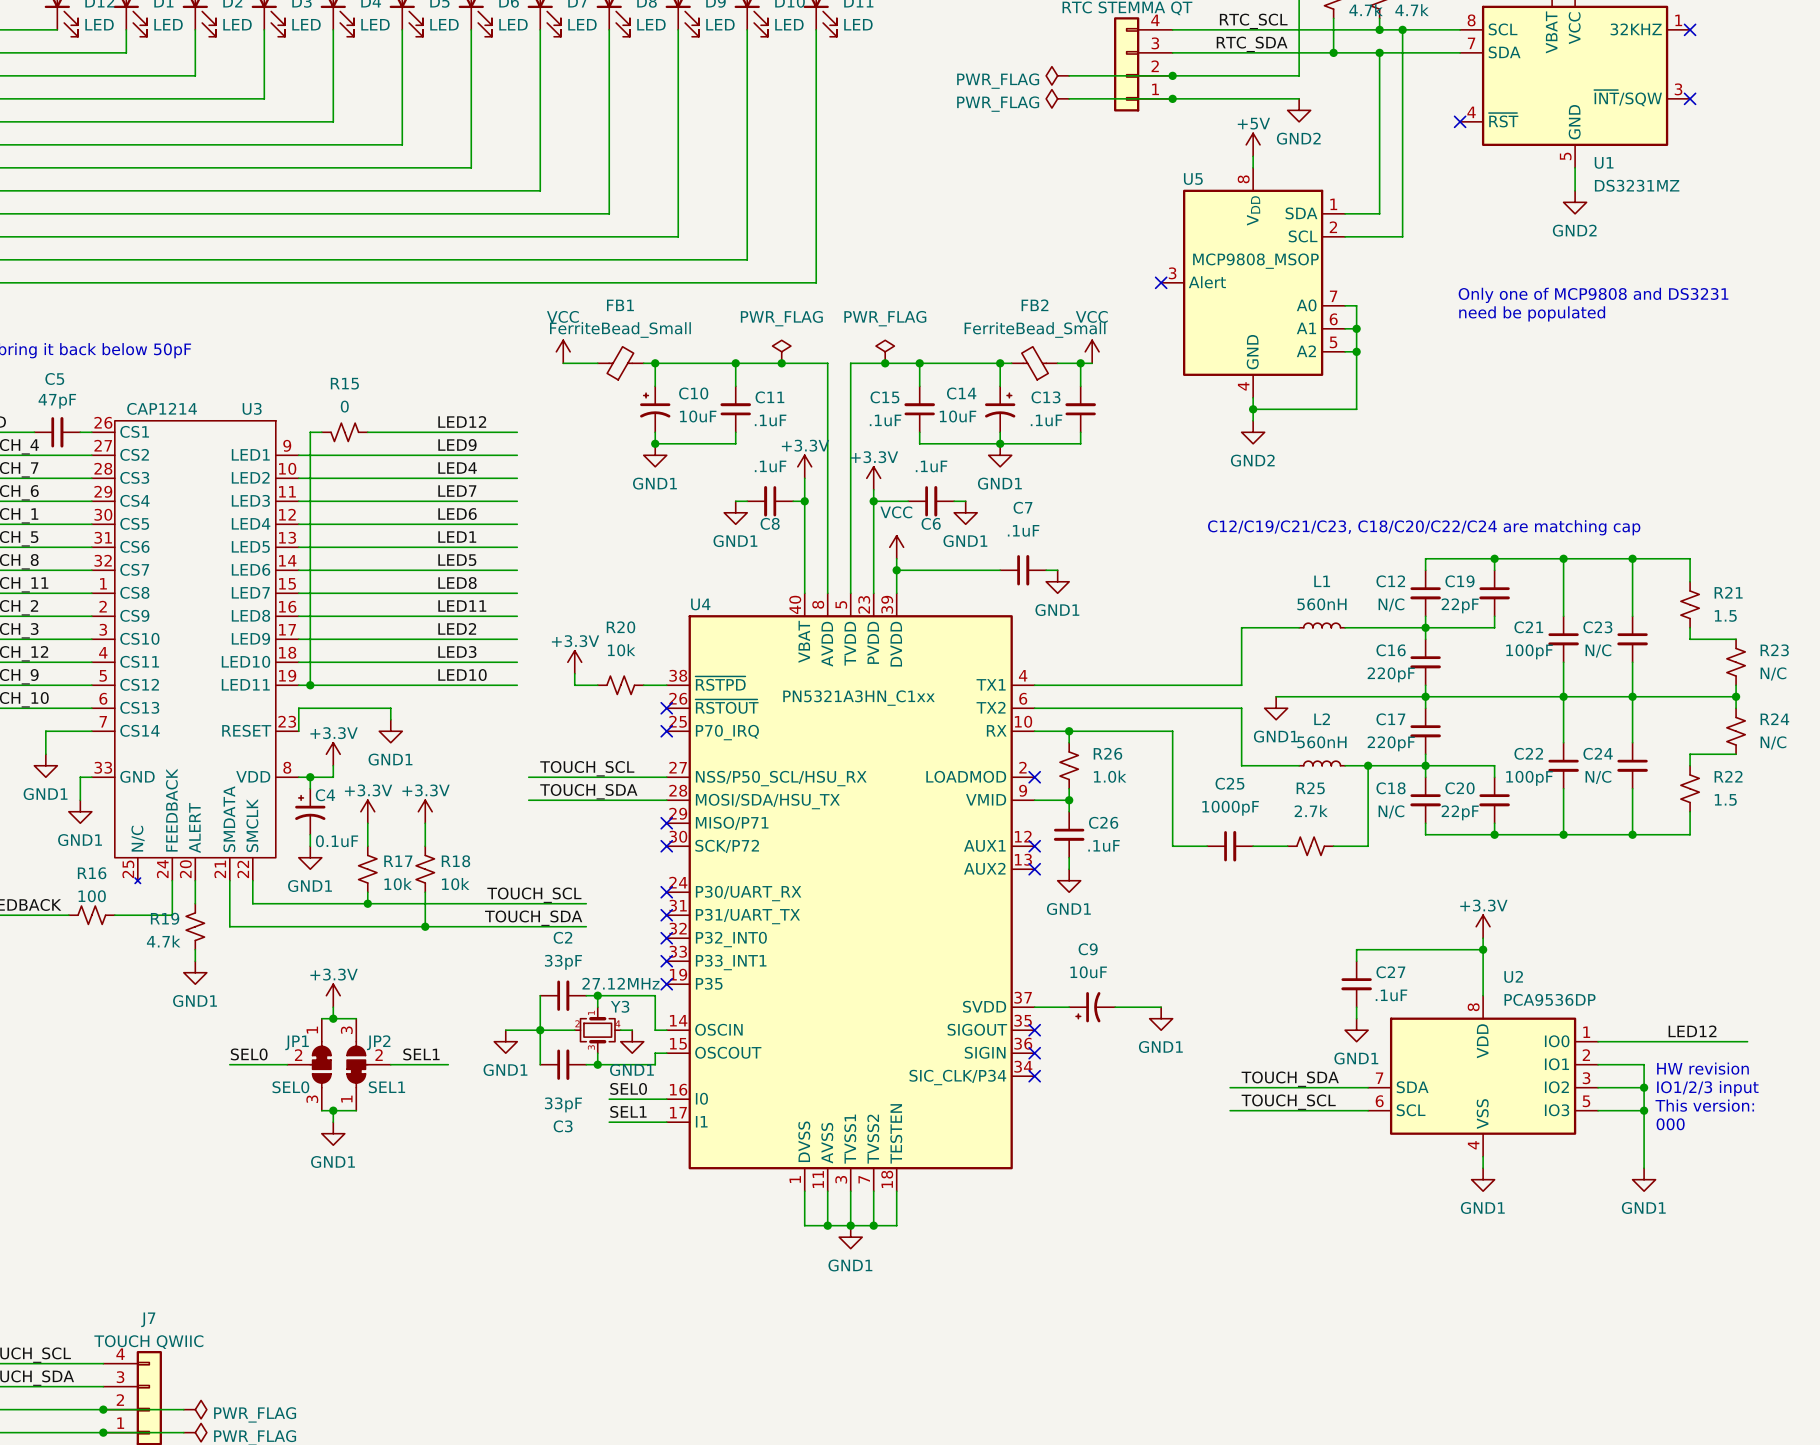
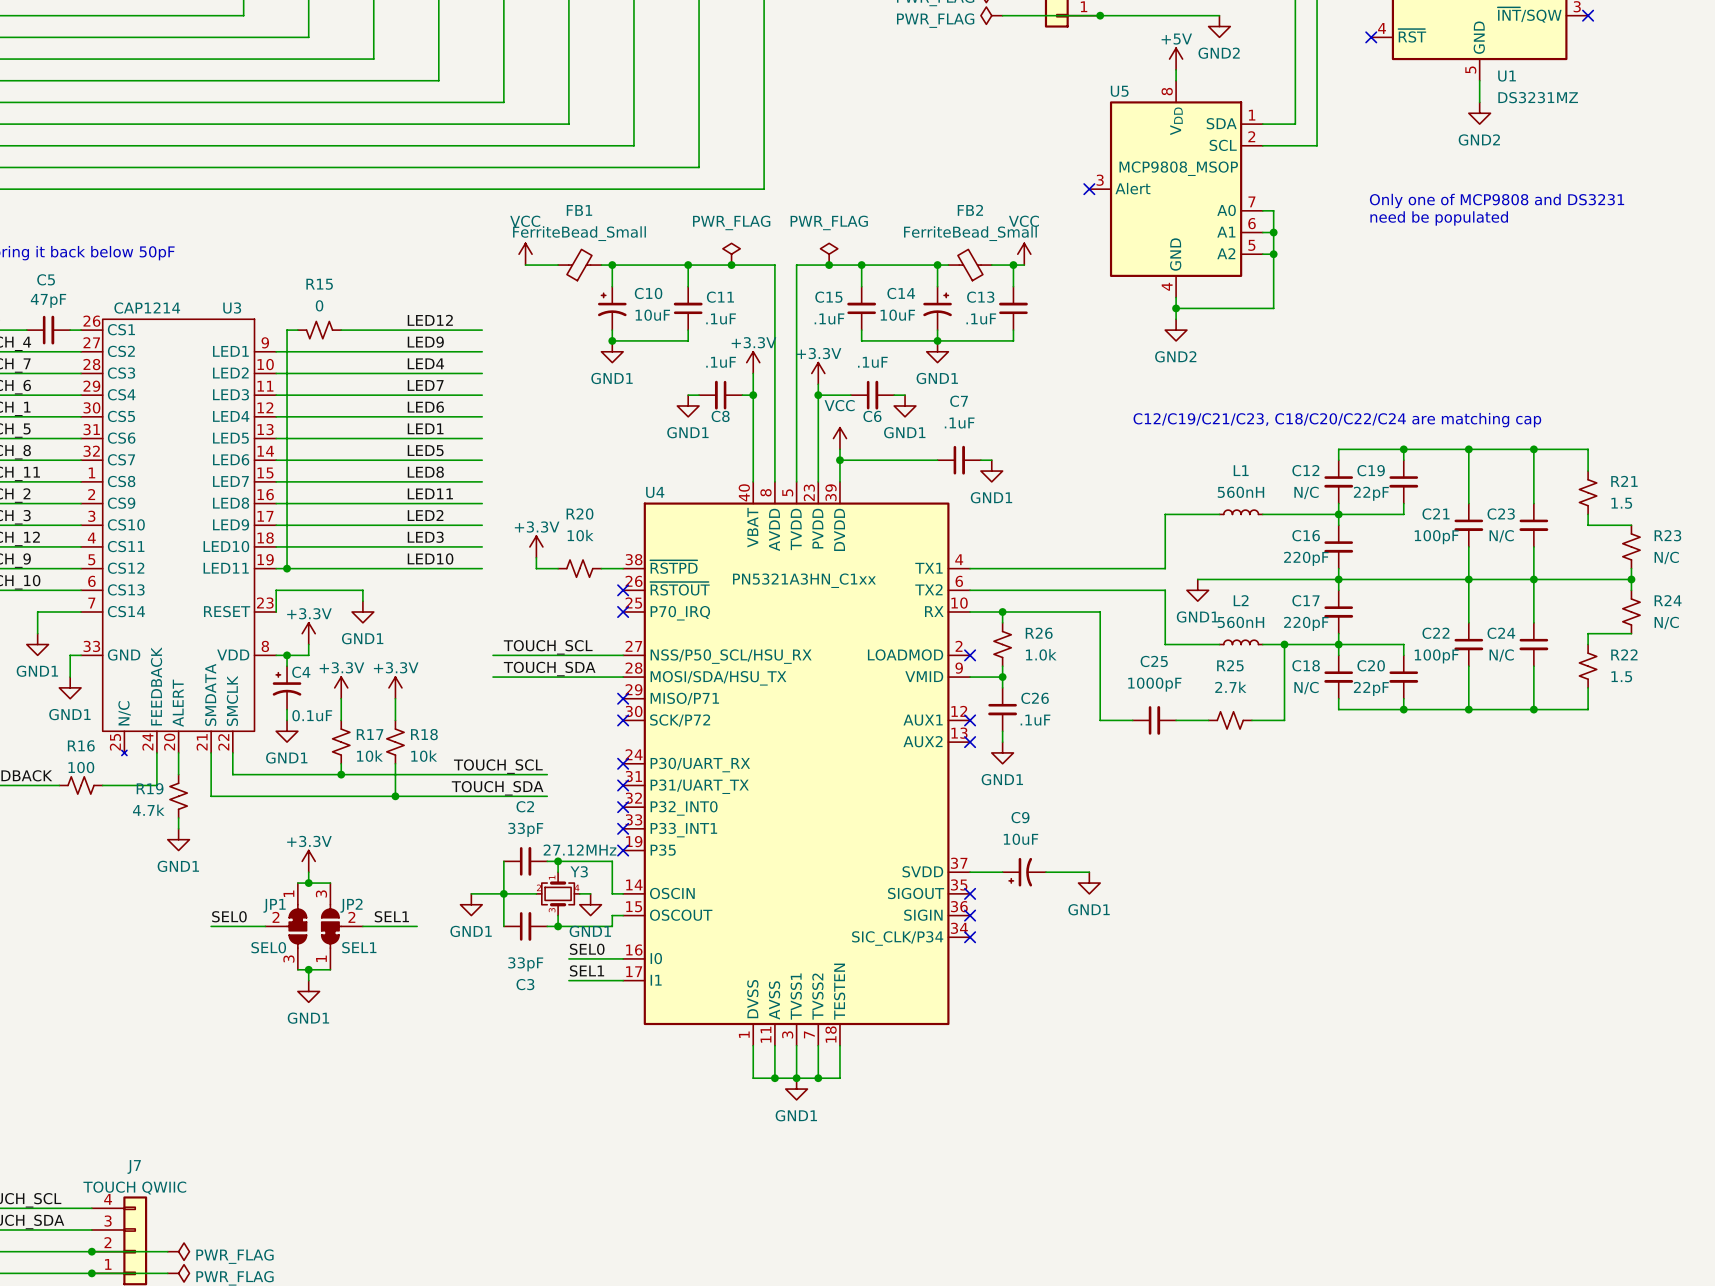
power symbol: +3.3V (1483, 926) -> none
wire: (1483, 938) (1483, 995) -> none
wire: (1483, 949) (1356, 949) (1356, 961) -> none
junction: (1483, 949) -> none
C27: .1uF (1356, 984) -> none
wire: (1356, 1007) (1356, 1018) -> none
power symbol: GND1 (1356, 1030) -> none
label: LED12 (1692, 1031) -> none
wire: (1598, 1041) (1747, 1041) -> none
wire: (1598, 1064) (1644, 1064) (1644, 1168) -> none
text: HW revision (1702, 1068) -> none
U2: PCA9536DP (1483, 1076) -> none
label: TOUCH_SDA (1290, 1079) -> none
wire: (1230, 1087) (1368, 1087) -> none
wire: (1598, 1087) (1644, 1087) -> none
junction: (1644, 1087) -> none
text: IO1/2/3 input (1707, 1088) -> none
label: TOUCH_SCL (1288, 1102) -> none
text: This version: (1704, 1105) -> none
wire: (1230, 1110) (1368, 1110) -> none
wire: (1598, 1110) (1644, 1110) -> none
junction: (1644, 1110) -> none
text: 000 (1670, 1124) -> none
wire: (1483, 1156) (1483, 1168) -> none
power symbol: GND1 (1483, 1179) -> none
power symbol: GND1 (1644, 1179) -> none

